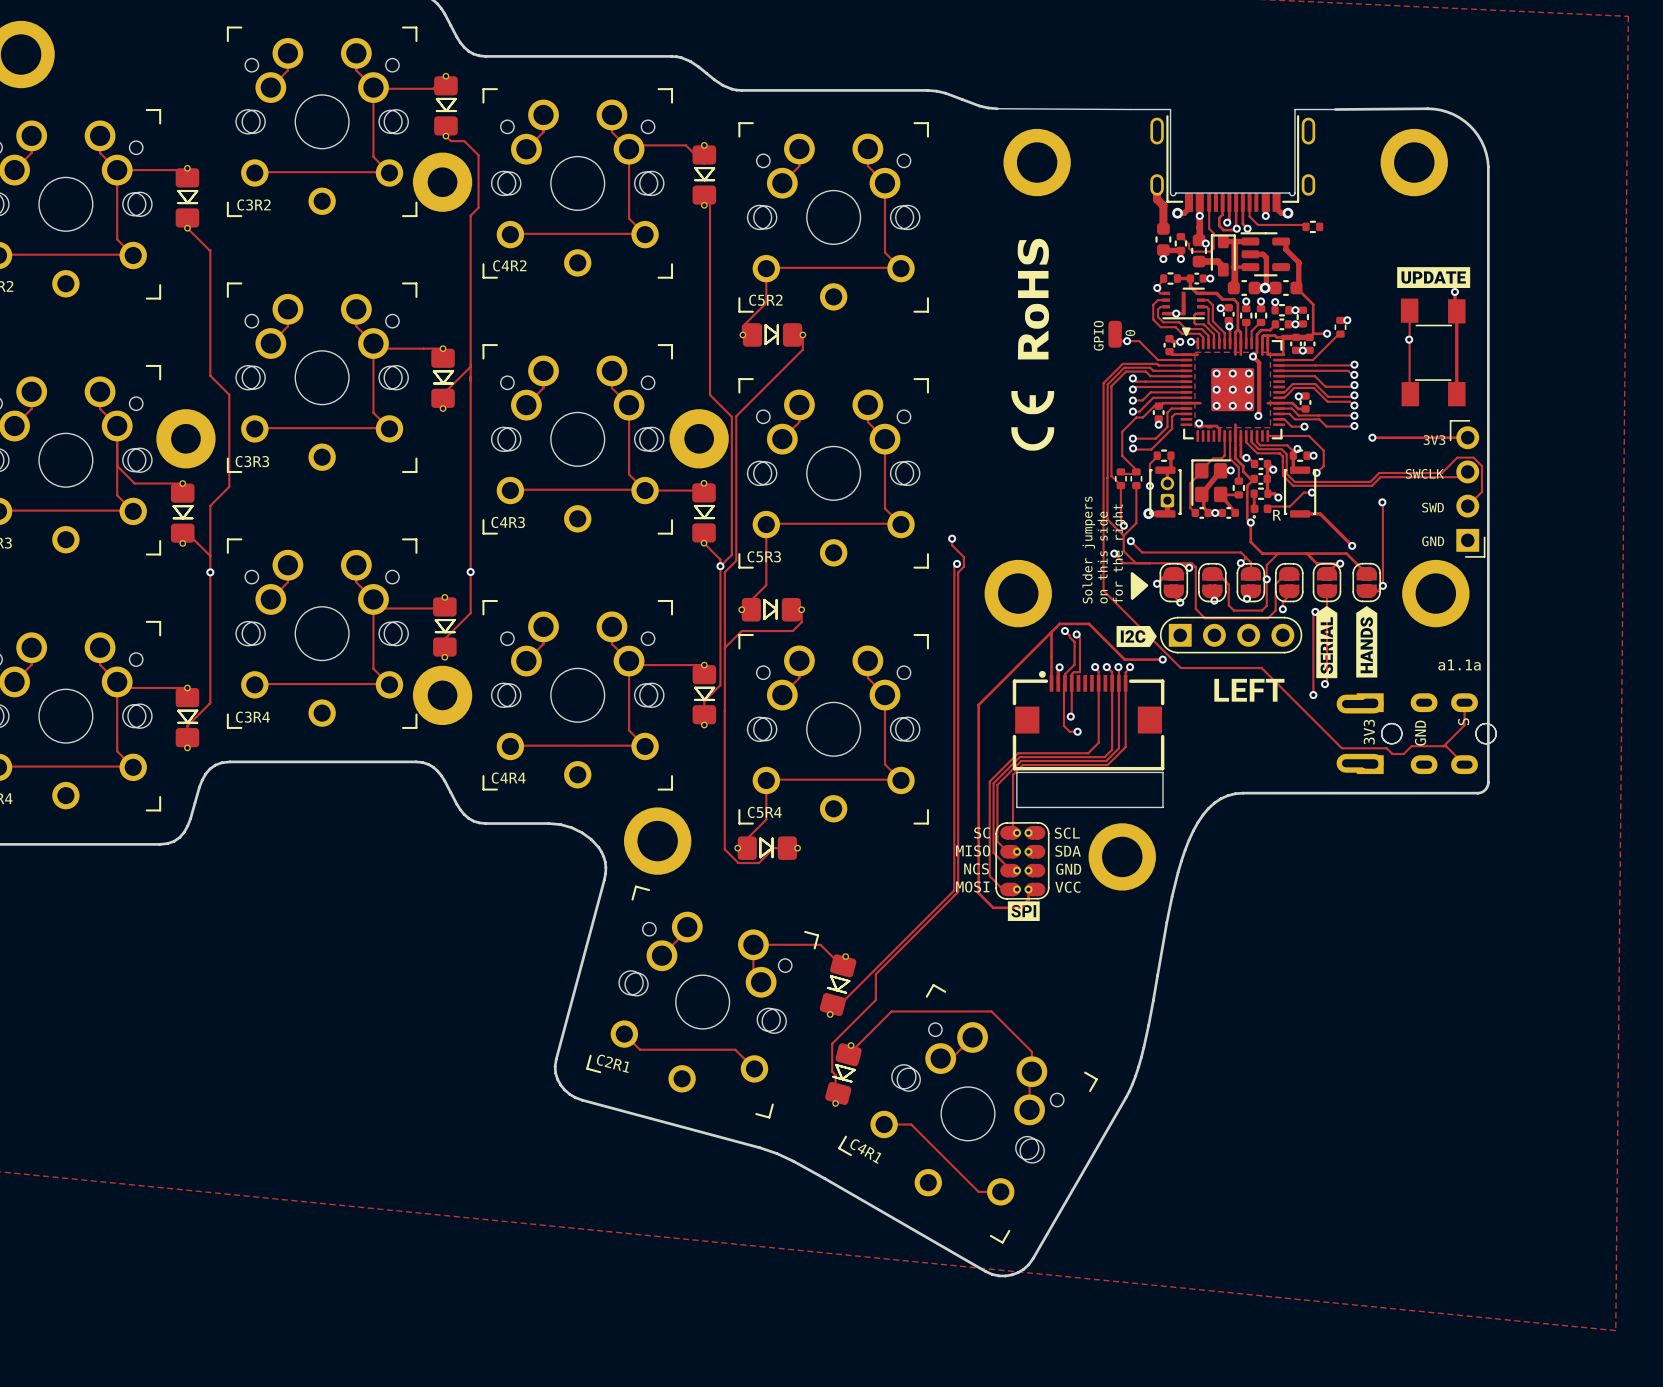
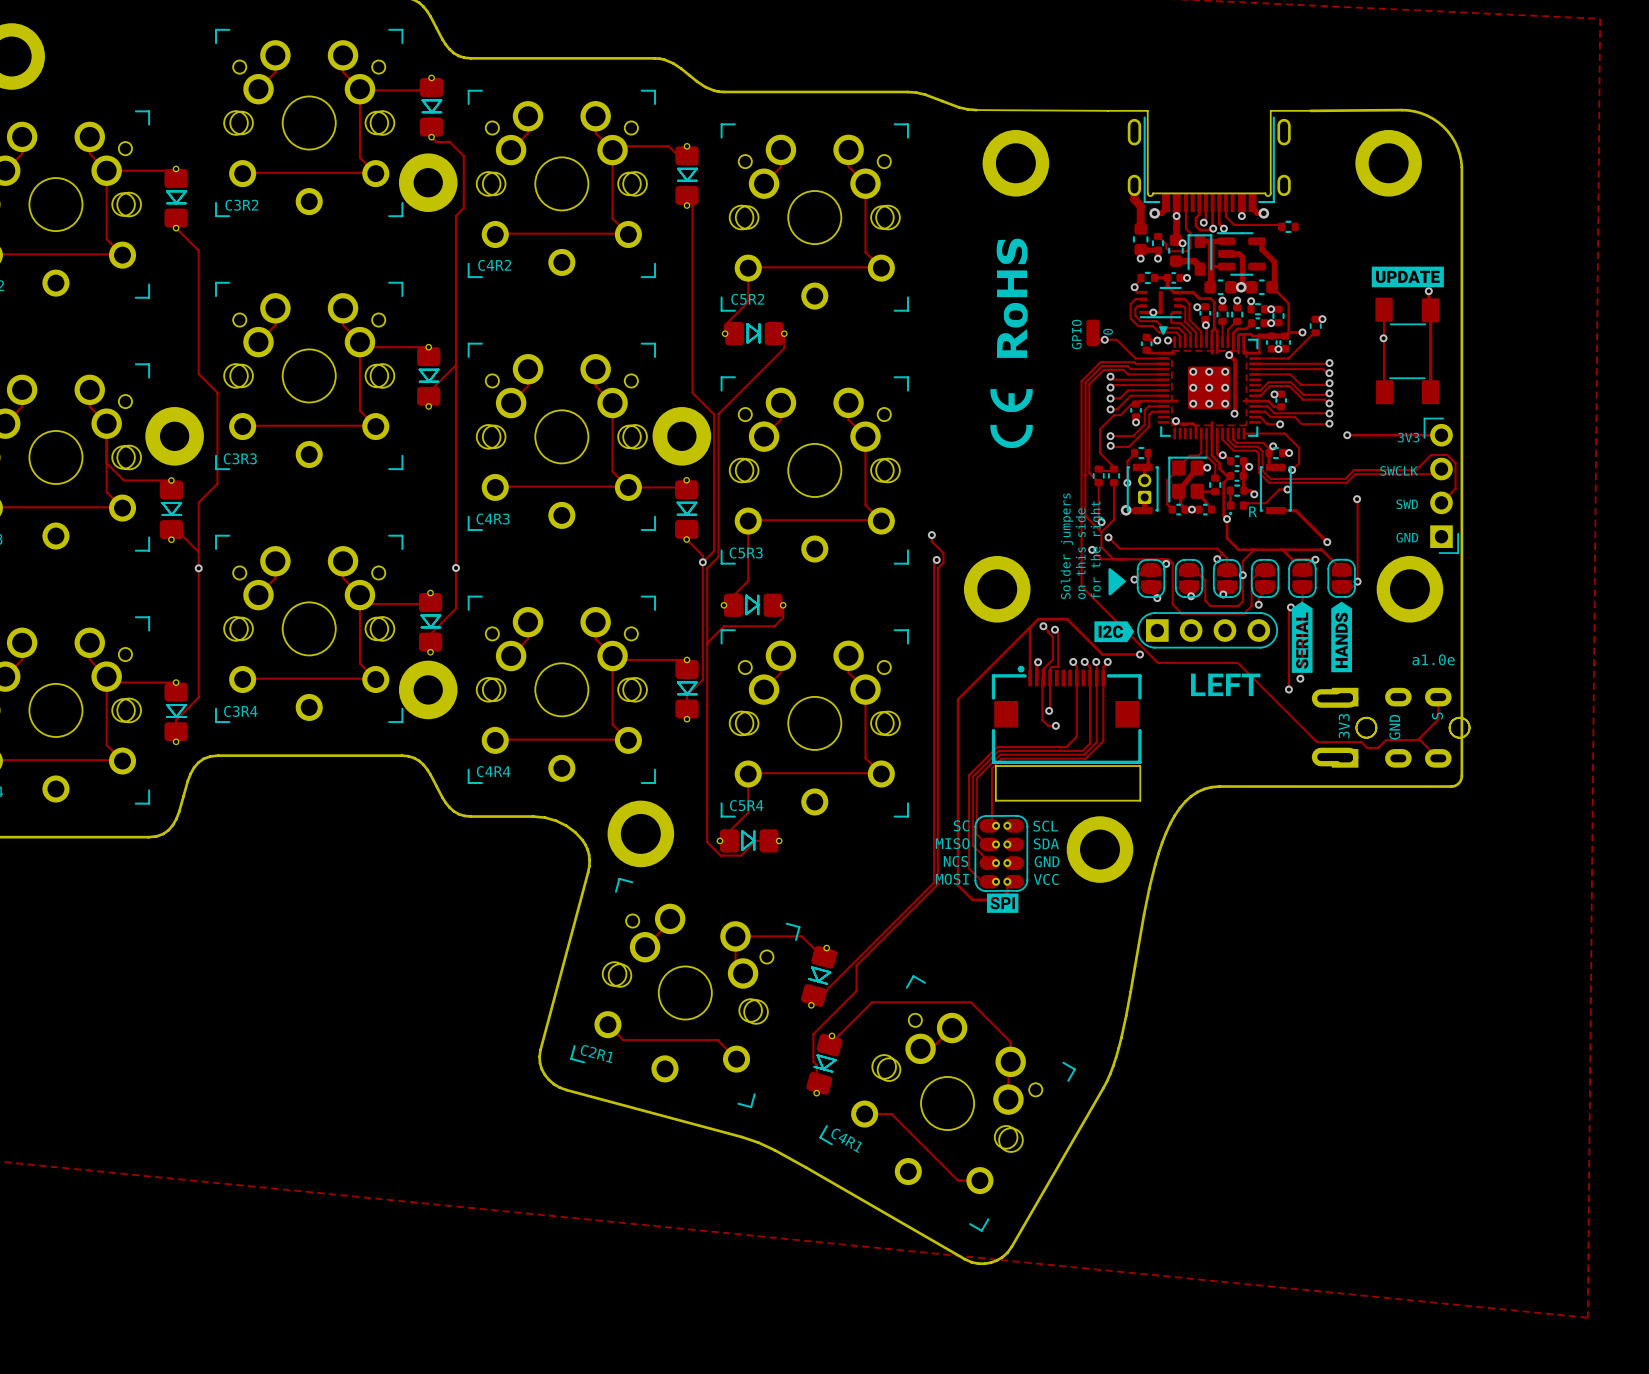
text: a1.1a (1459, 665) -> a1.0e (1433, 659)

